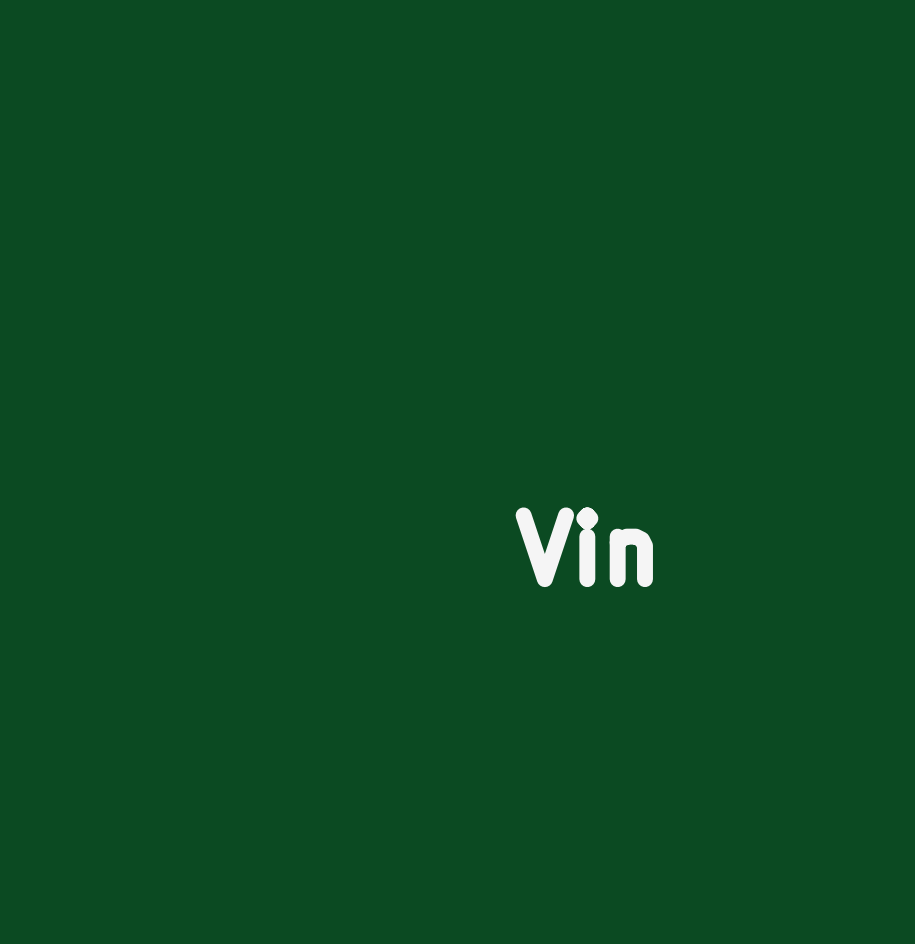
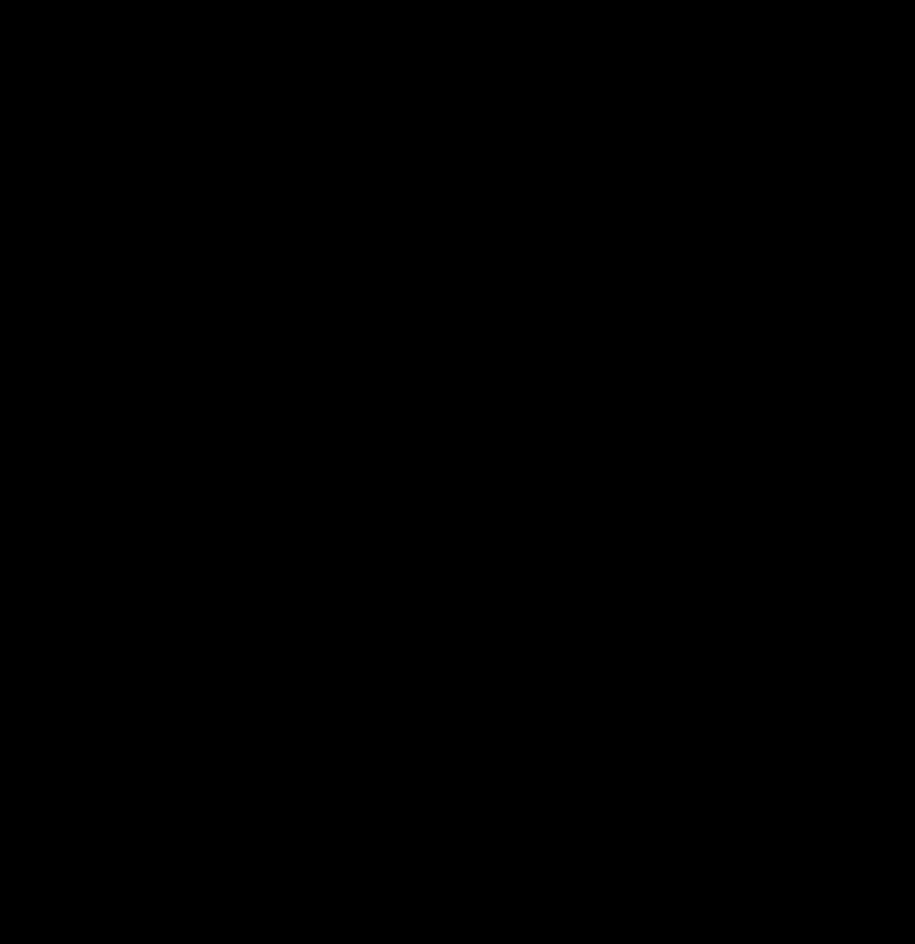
text: Vin (584, 547) -> none

